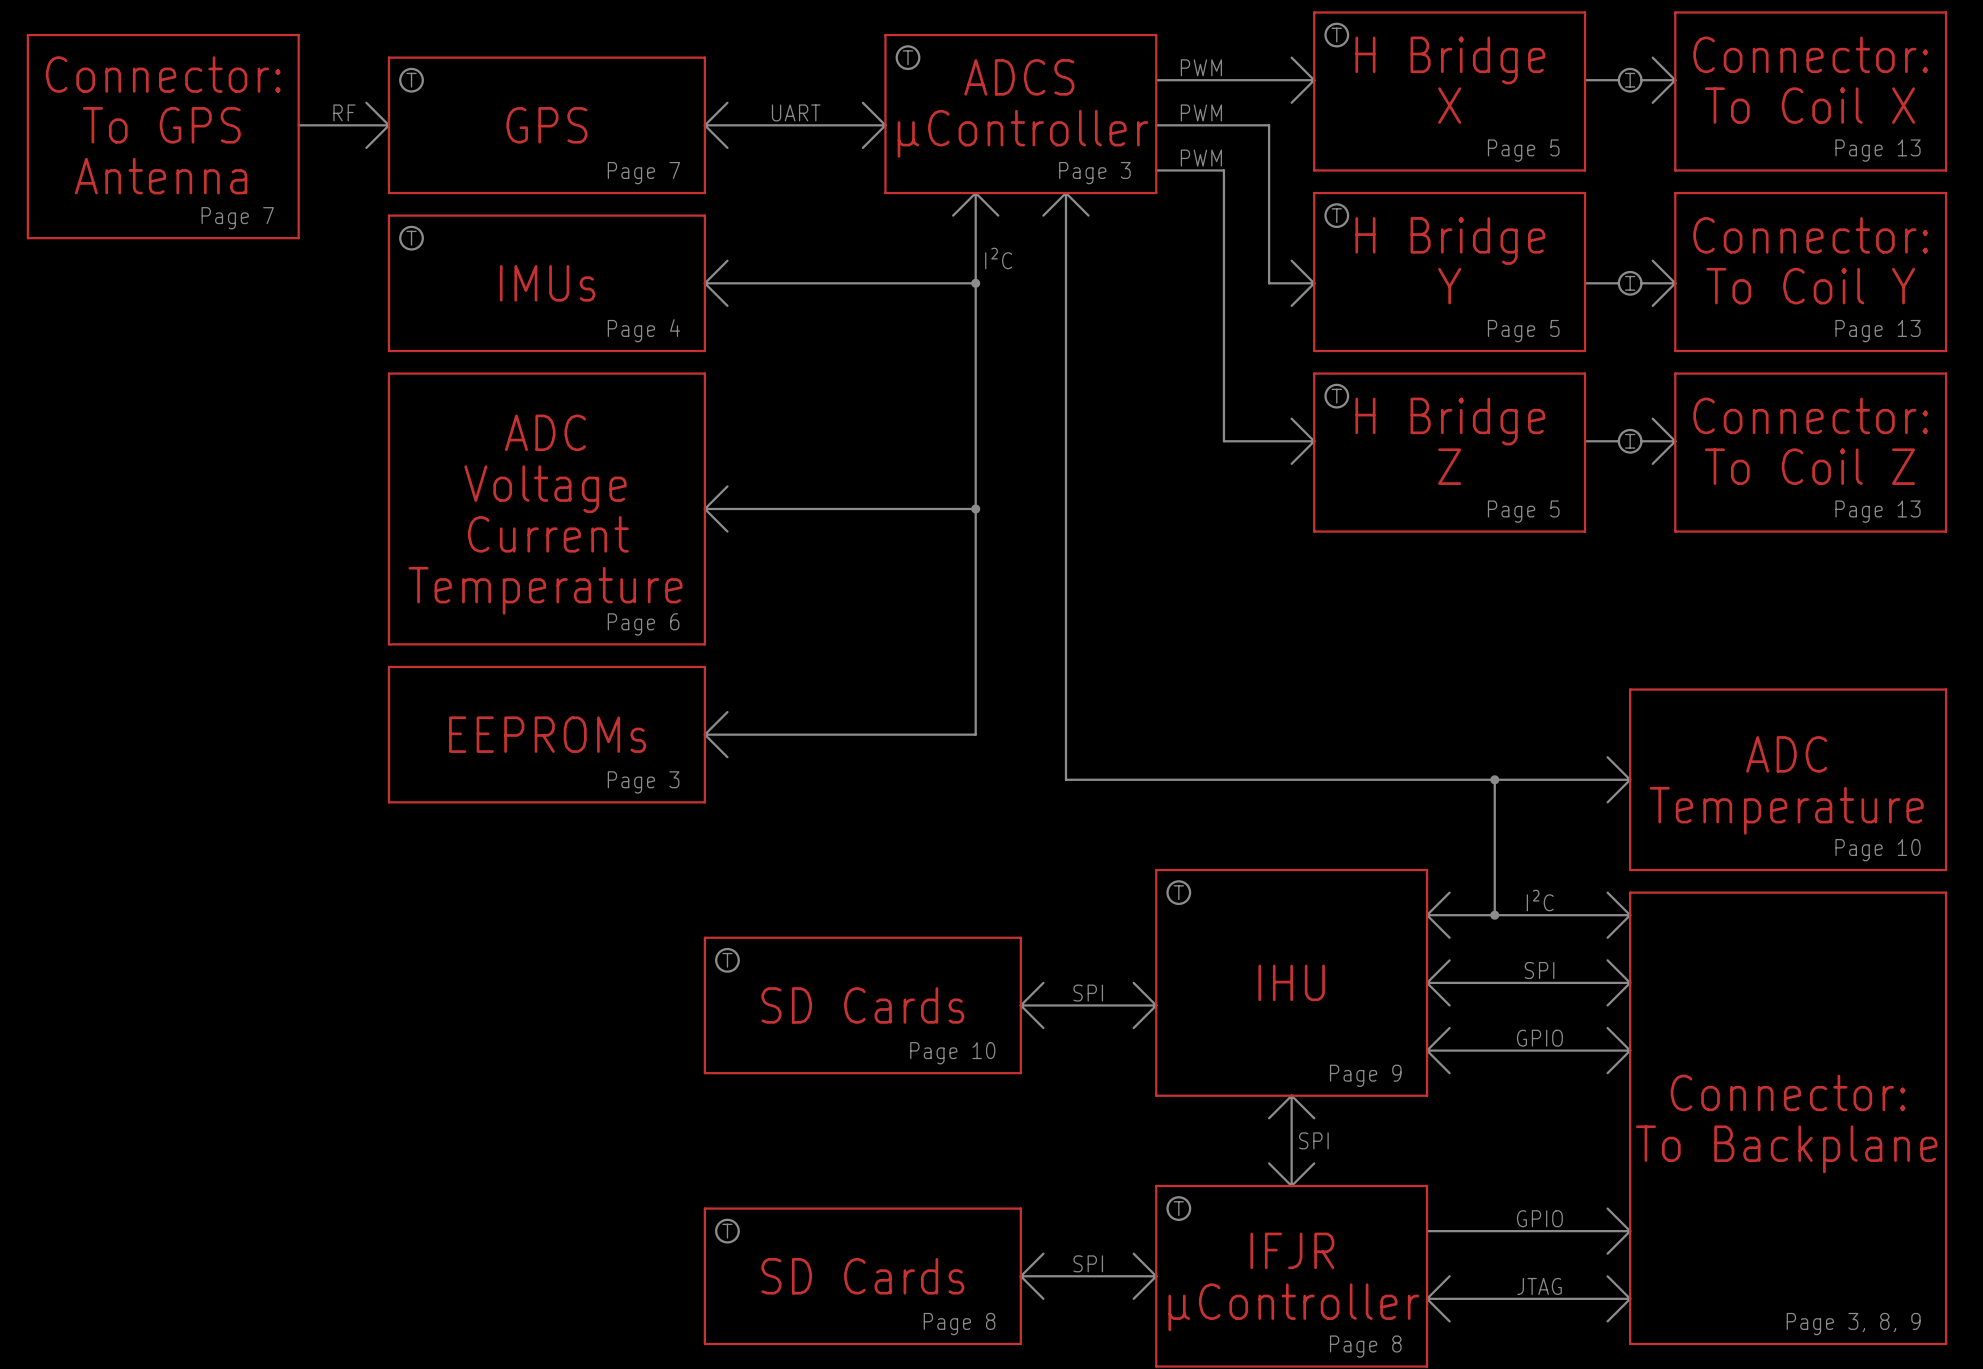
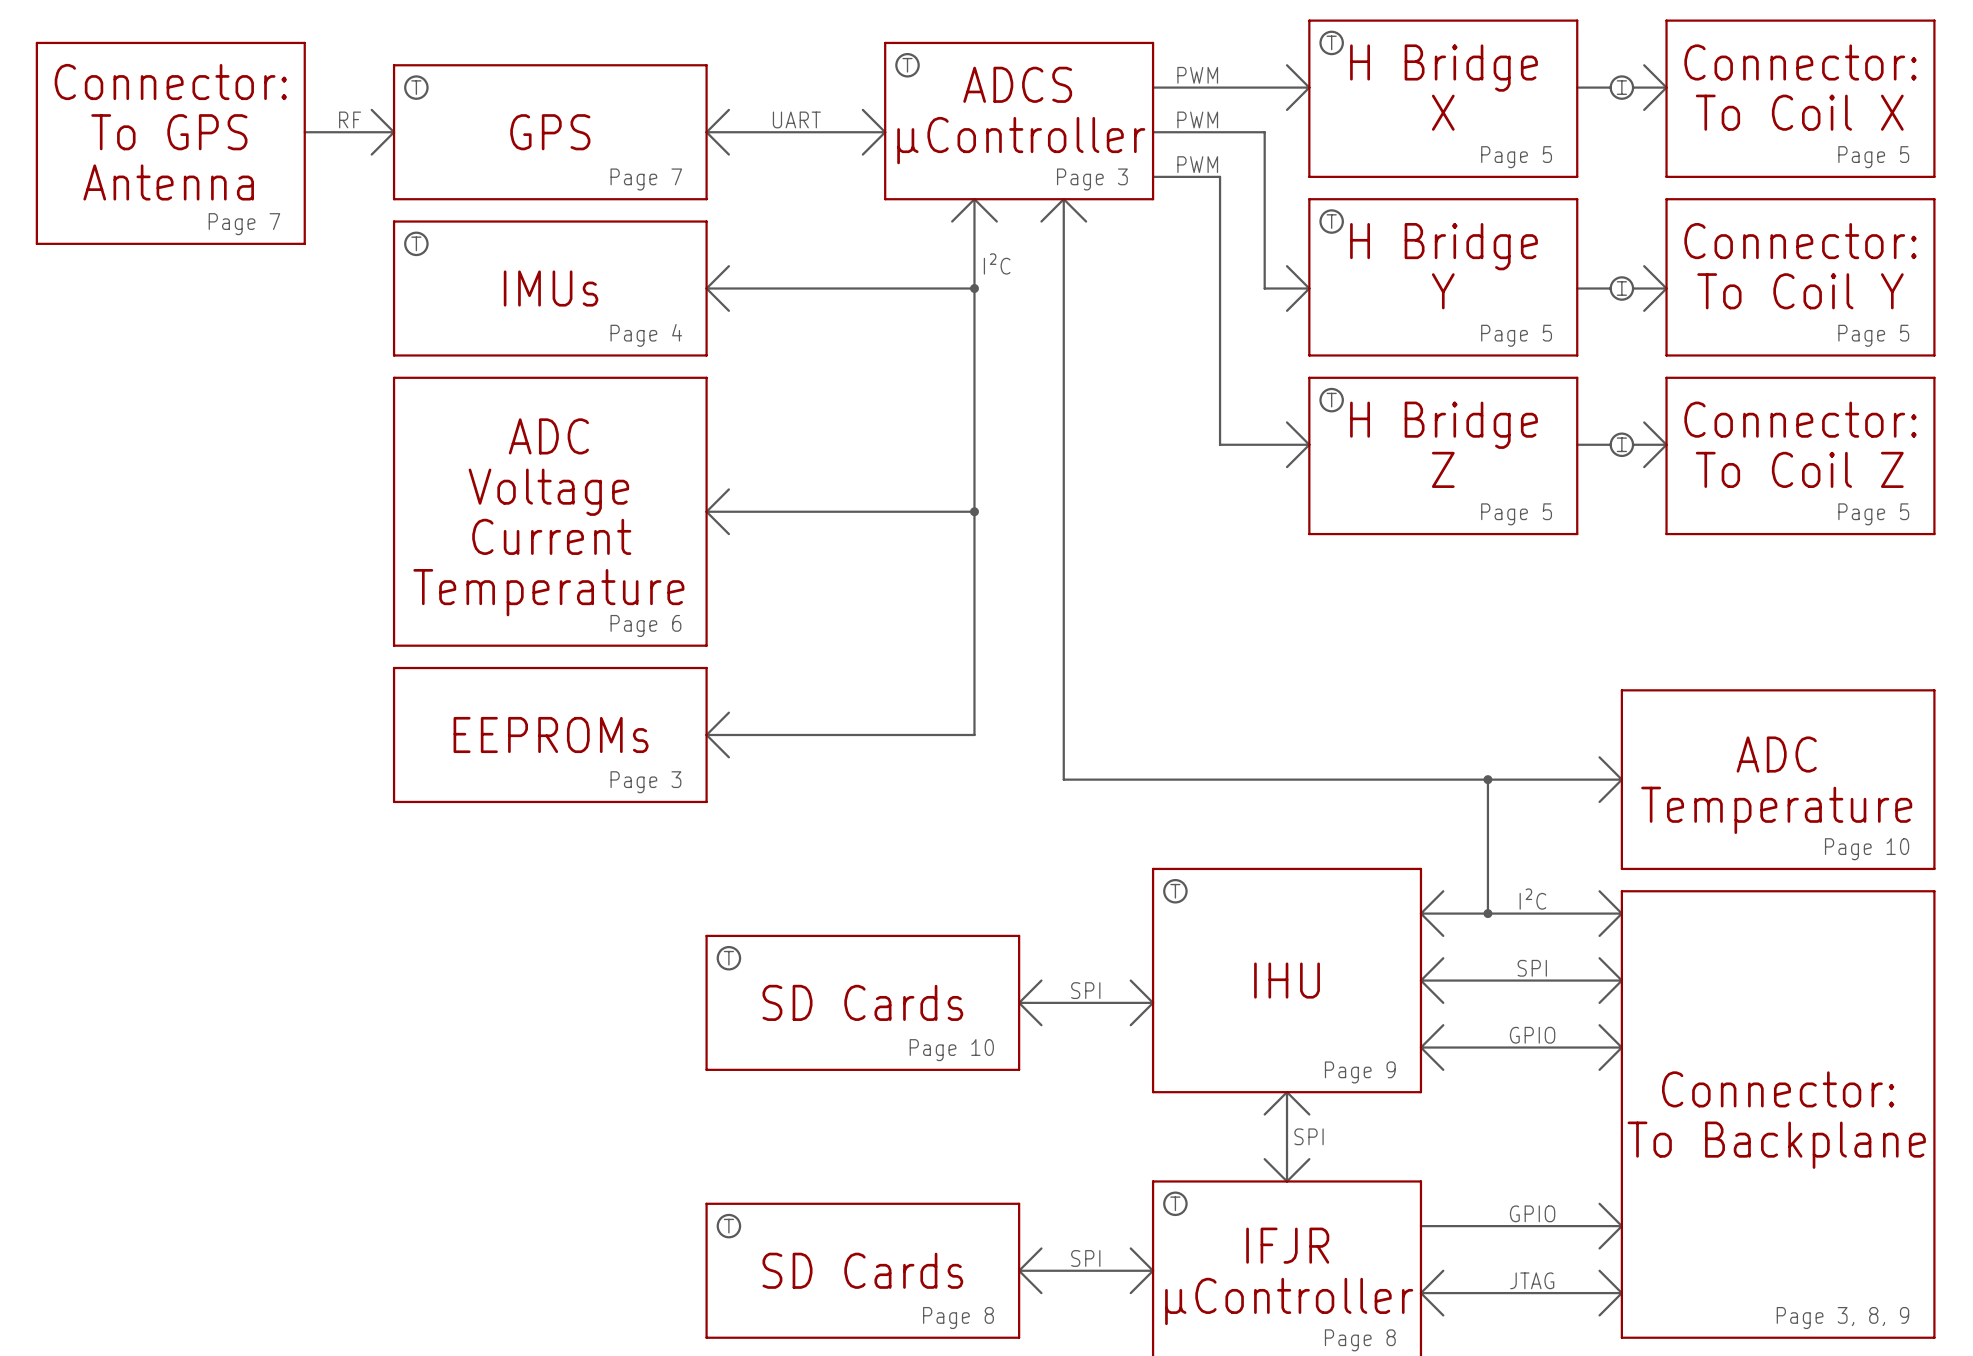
text: Page 13 (1878, 150) -> Page 5 (1873, 157)
text: Page 13 (1878, 331) -> Page 5 (1873, 335)
text: Page 13 (1878, 511) -> Page 5 (1873, 514)

